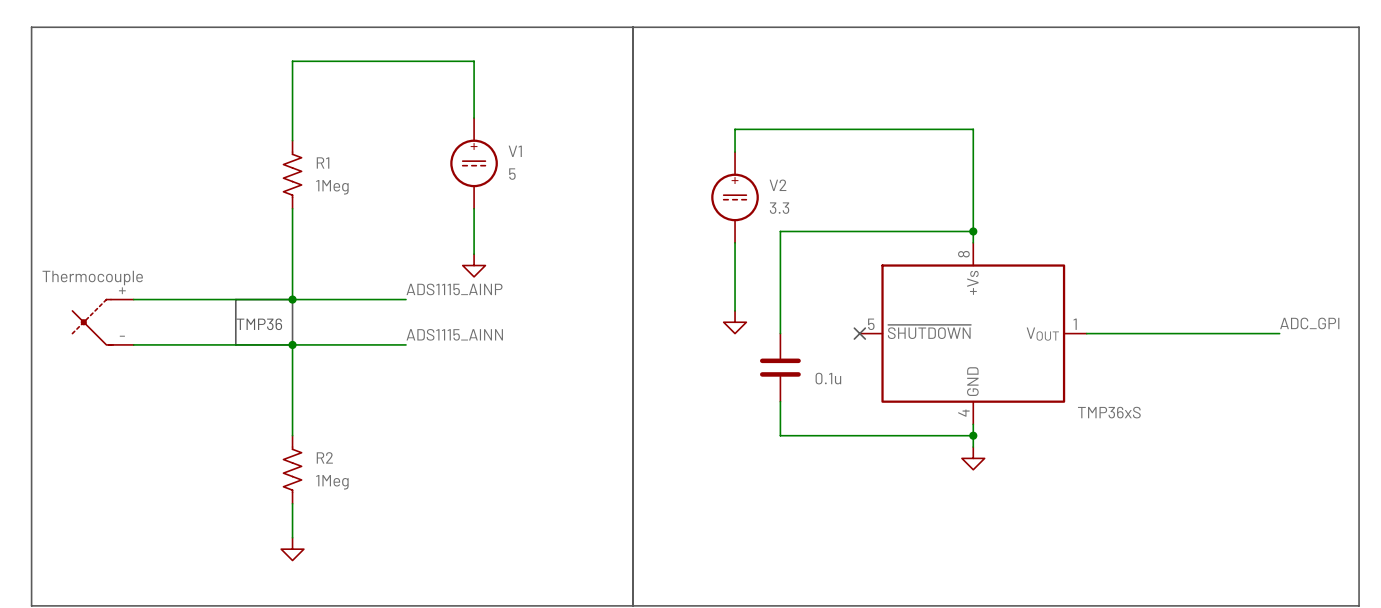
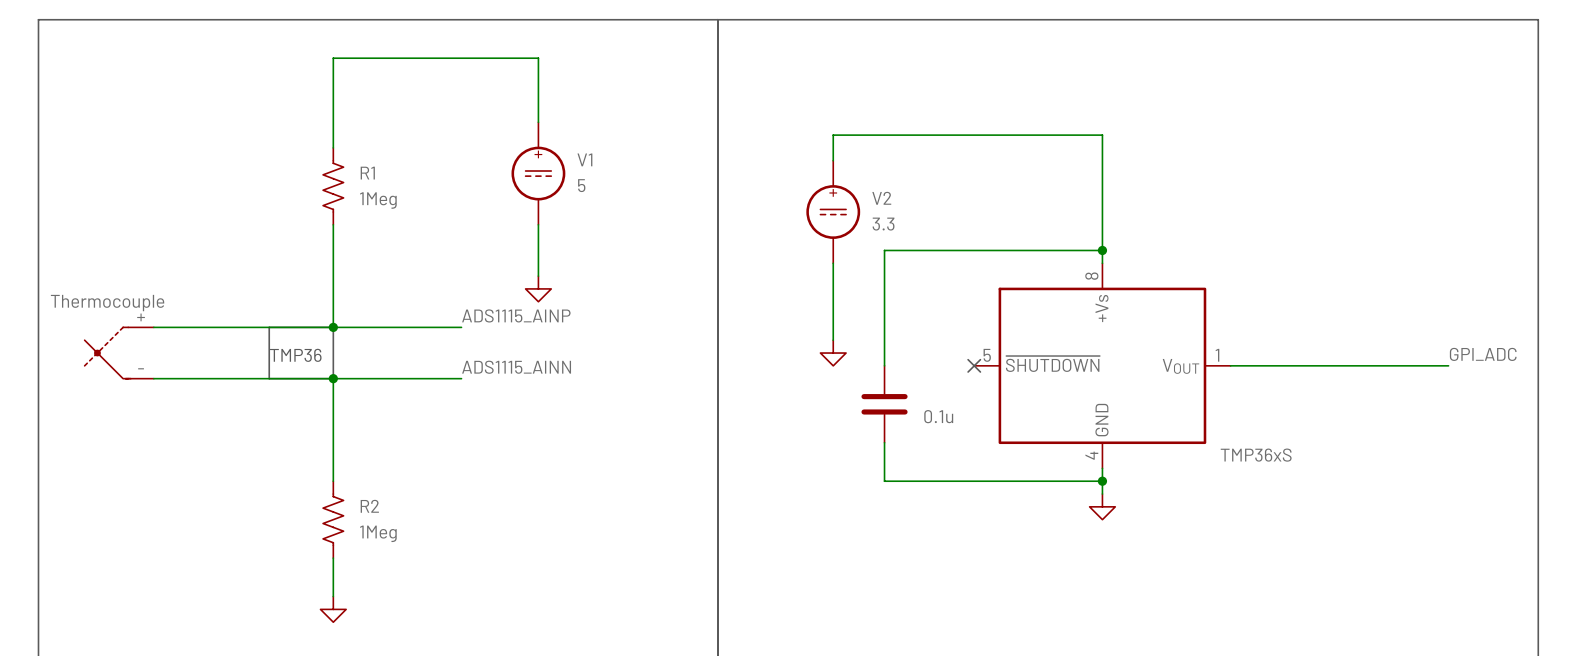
label: ADC_GPI (1309, 323) -> GPI_ADC (1483, 354)

